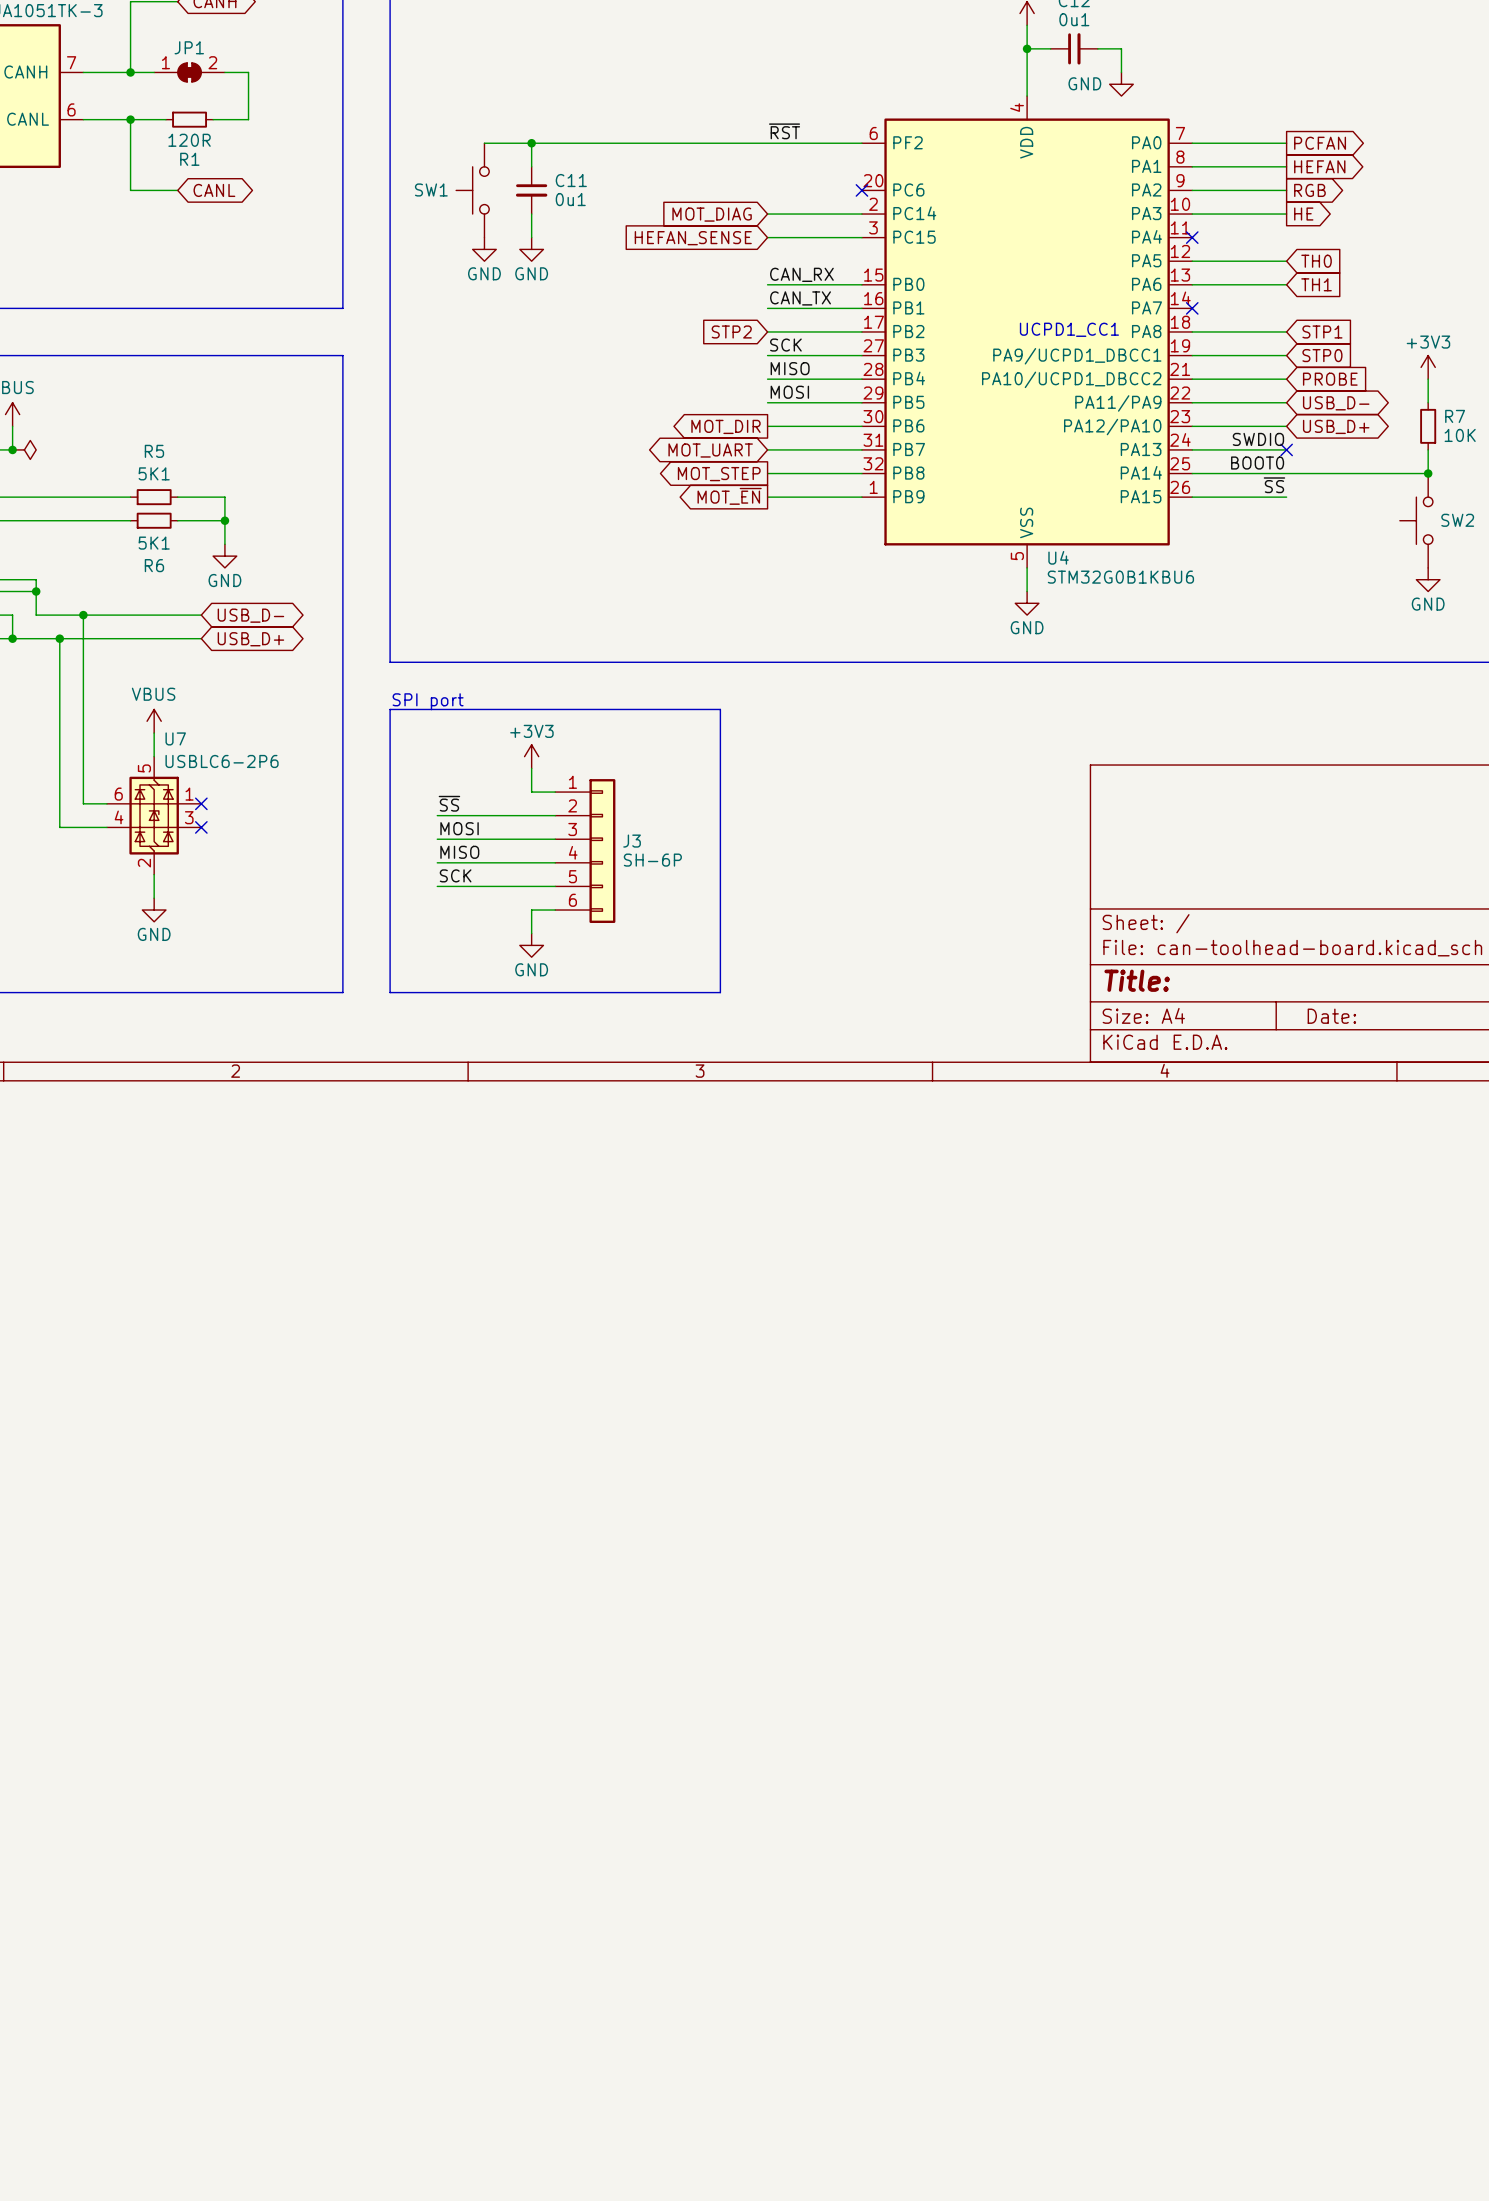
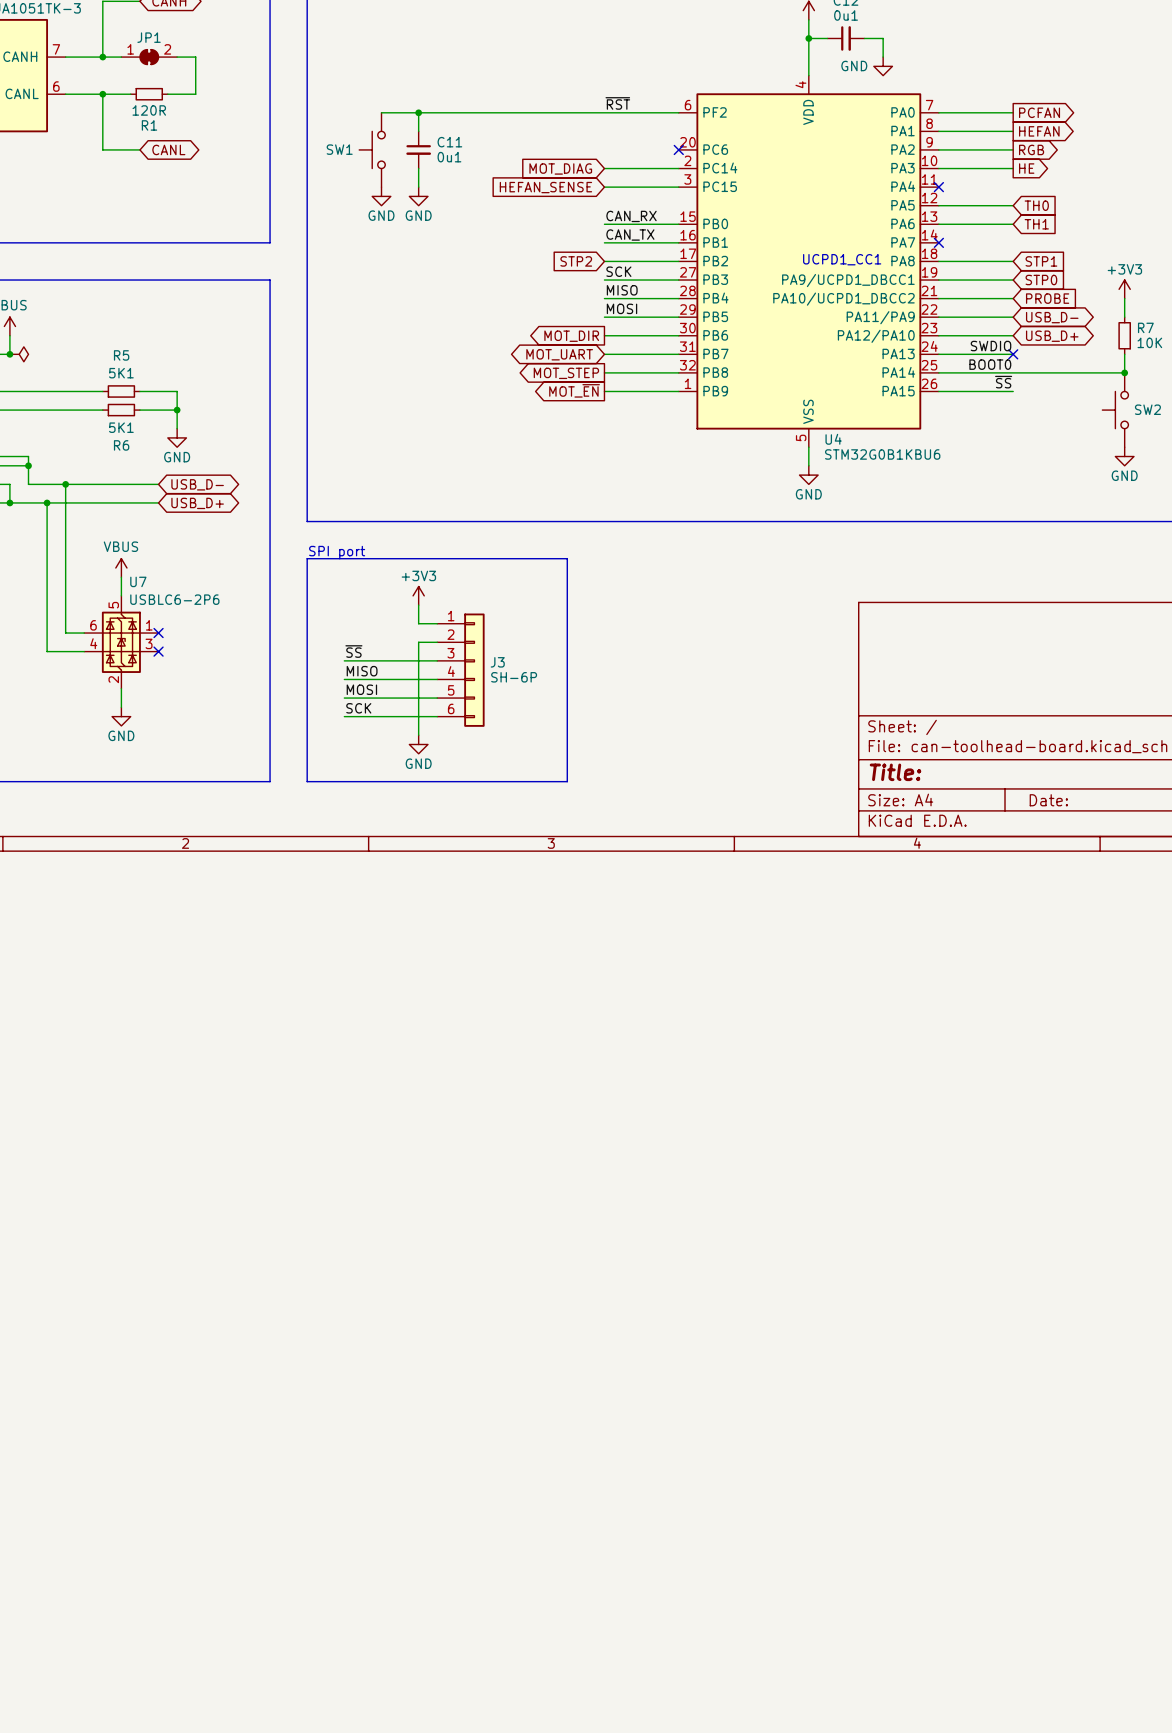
label: ~{SS} (449, 803) -> none
wire: (437, 815) (531, 815) -> (344, 716) (418, 716) (418, 642)
label: MOSI (459, 828) -> ~{SS} (353, 651)
label: SCK (455, 875) -> MOSI (361, 689)
label: none -> SCK (358, 708)

